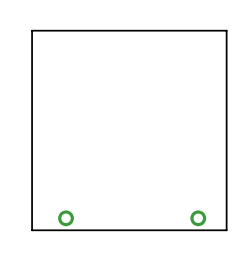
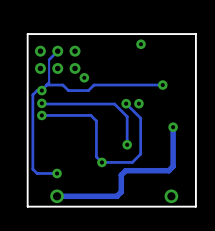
via: none -> (141, 44)
via: none -> (40, 51)
track: none -> (57, 51) (49, 59) (49, 82) (46, 85)
via: none -> (57, 51)
via: none -> (75, 51)
via: none -> (40, 68)
via: none -> (57, 68)
via: none -> (75, 68)
via: none -> (84, 77)
track: none -> (46, 85) (41, 90) (37, 90) (32, 94) (32, 169) (37, 173) (57, 173)
track: none -> (162, 85) (94, 85) (88, 90) (68, 90) (62, 85) (46, 85)
via: none -> (162, 85)
via: none -> (41, 90)
track: none -> (41, 103) (114, 104) (127, 116) (127, 144)
via: none -> (41, 103)
track: none -> (126, 103) (140, 118) (140, 154) (132, 162) (101, 162) (96, 156) (96, 120) (90, 115) (41, 115)
via: none -> (126, 103)
via: none -> (138, 103)
via: none -> (41, 115)
track: none -> (173, 127) (173, 166) (168, 170) (125, 170) (121, 175) (121, 191) (116, 196) (54, 196)
via: none -> (173, 127)
via: none -> (127, 144)
via: none -> (101, 162)
via: none -> (57, 173)

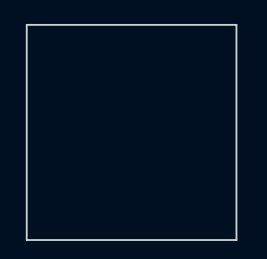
via: (141, 44) -> none
via: (40, 51) -> none
track: (57, 51) (49, 59) (49, 82) (46, 85) -> none
via: (57, 51) -> none
via: (75, 51) -> none
via: (40, 68) -> none
via: (57, 68) -> none
via: (75, 68) -> none
via: (84, 77) -> none
track: (46, 85) (41, 90) (37, 90) (32, 94) (32, 169) (37, 173) (57, 173) -> none
track: (162, 85) (94, 85) (88, 90) (68, 90) (62, 85) (46, 85) -> none
via: (162, 85) -> none
via: (41, 90) -> none
track: (41, 103) (114, 104) (127, 116) (127, 144) -> none
via: (41, 103) -> none
track: (126, 103) (140, 118) (140, 154) (132, 162) (101, 162) (96, 156) (96, 120) (90, 115) (41, 115) -> none
via: (126, 103) -> none
via: (138, 103) -> none
via: (41, 115) -> none
track: (173, 127) (173, 166) (168, 170) (125, 170) (121, 175) (121, 191) (116, 196) (54, 196) -> none
via: (173, 127) -> none
via: (127, 144) -> none
via: (101, 162) -> none
via: (57, 173) -> none
via: (57, 196) -> none
via: (171, 196) -> none

